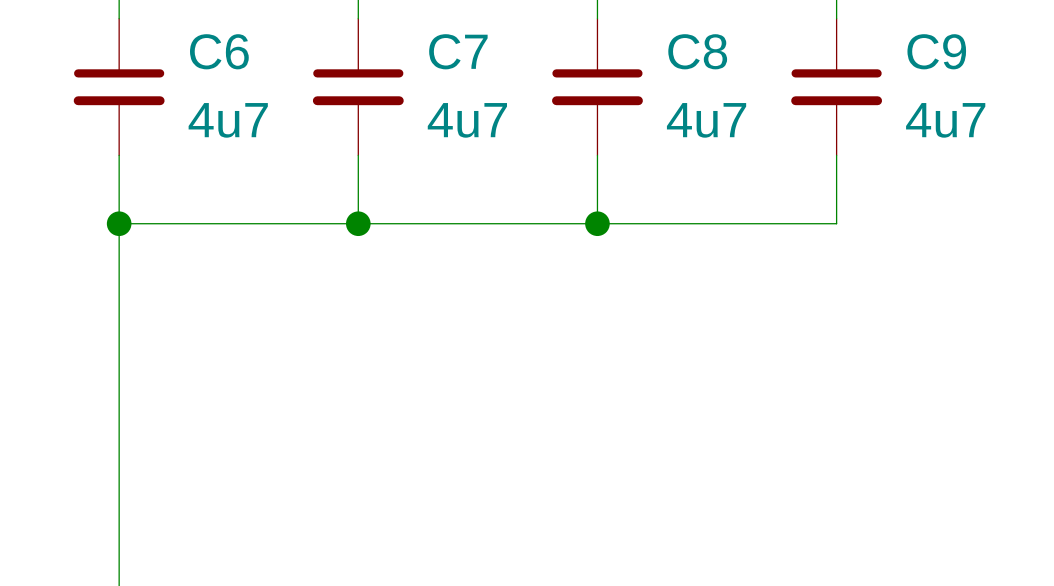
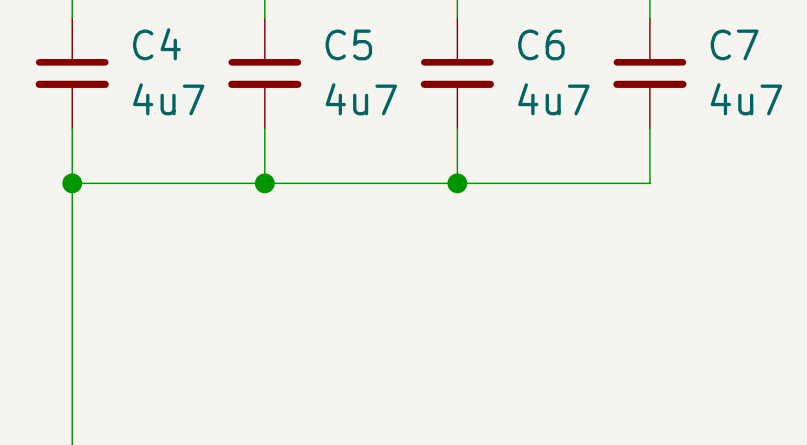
C6 name: C6 (219, 51) -> C4 (156, 44)
C7 name: C7 (458, 51) -> C5 (348, 44)
C8 name: C8 (697, 51) -> C6 (541, 44)
C9 name: C9 (936, 51) -> C7 (734, 44)

